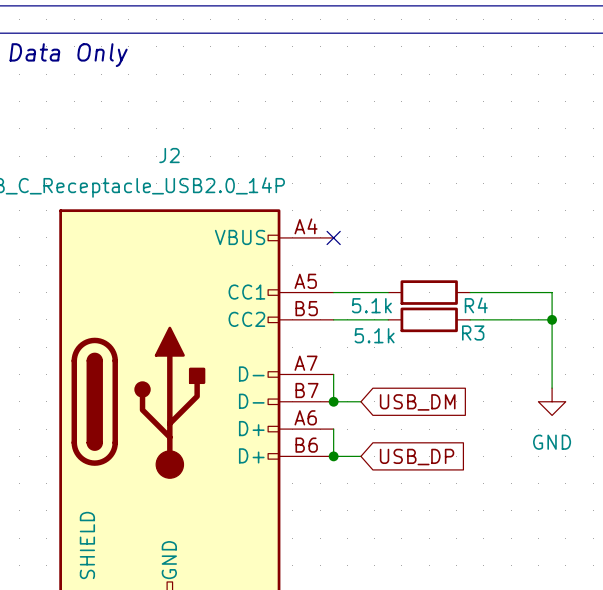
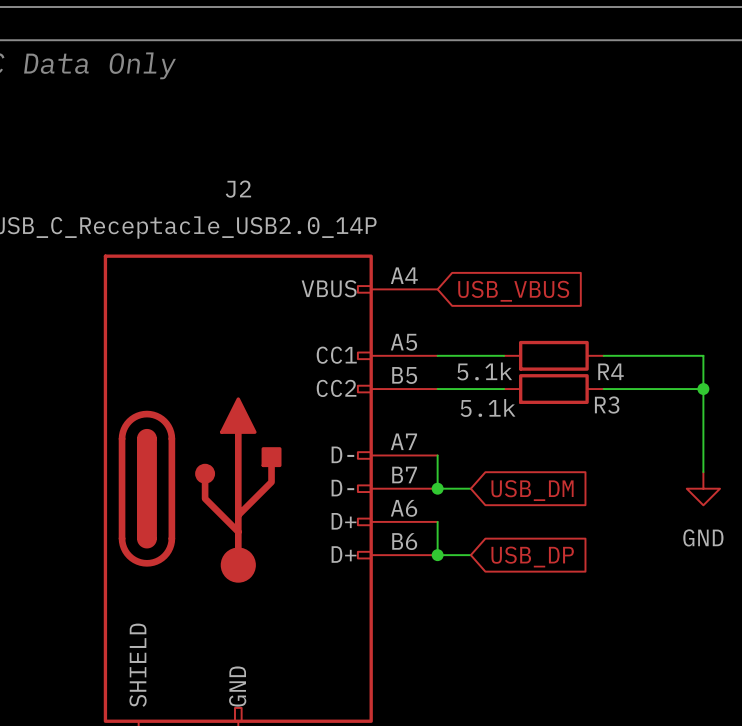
no-connect mark: (333, 237) -> none
global label: none -> USB_VBUS (513, 291)

